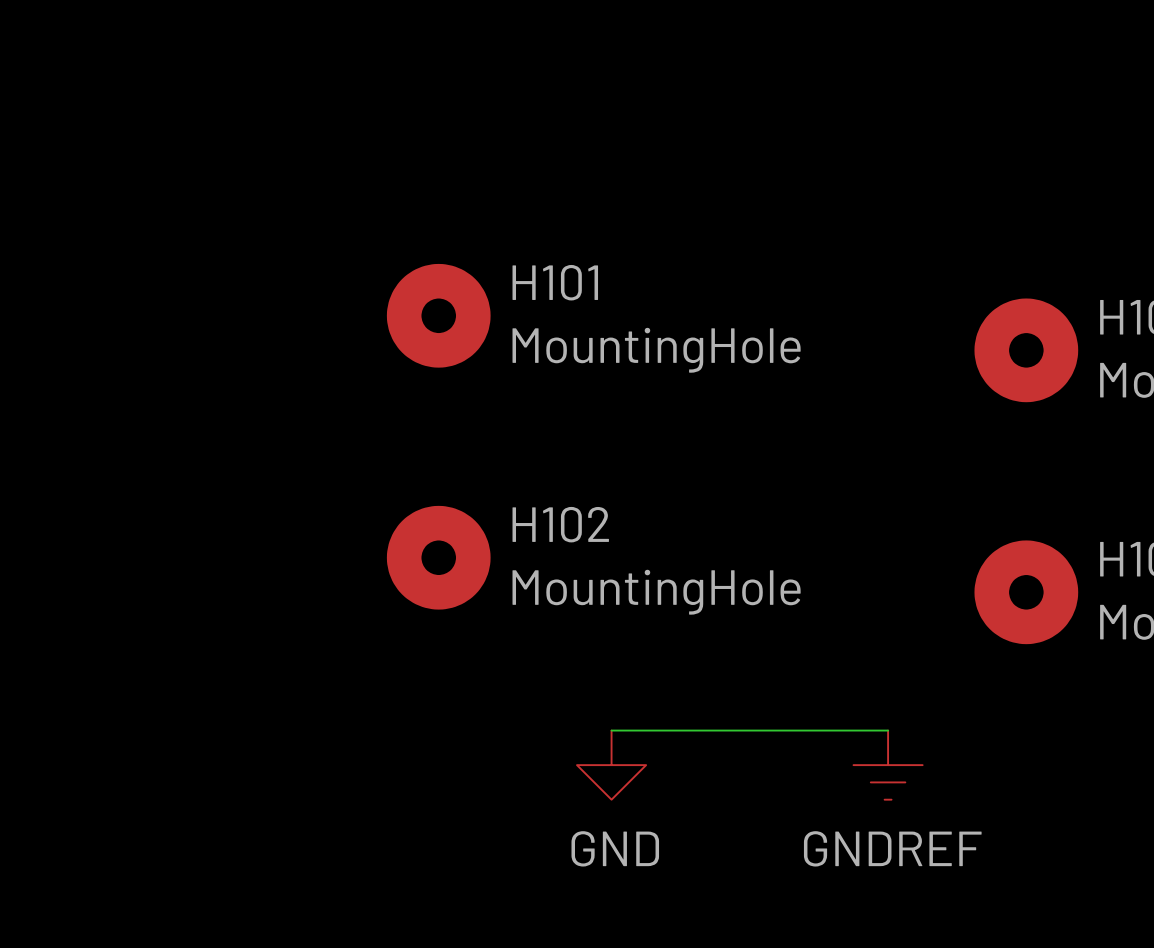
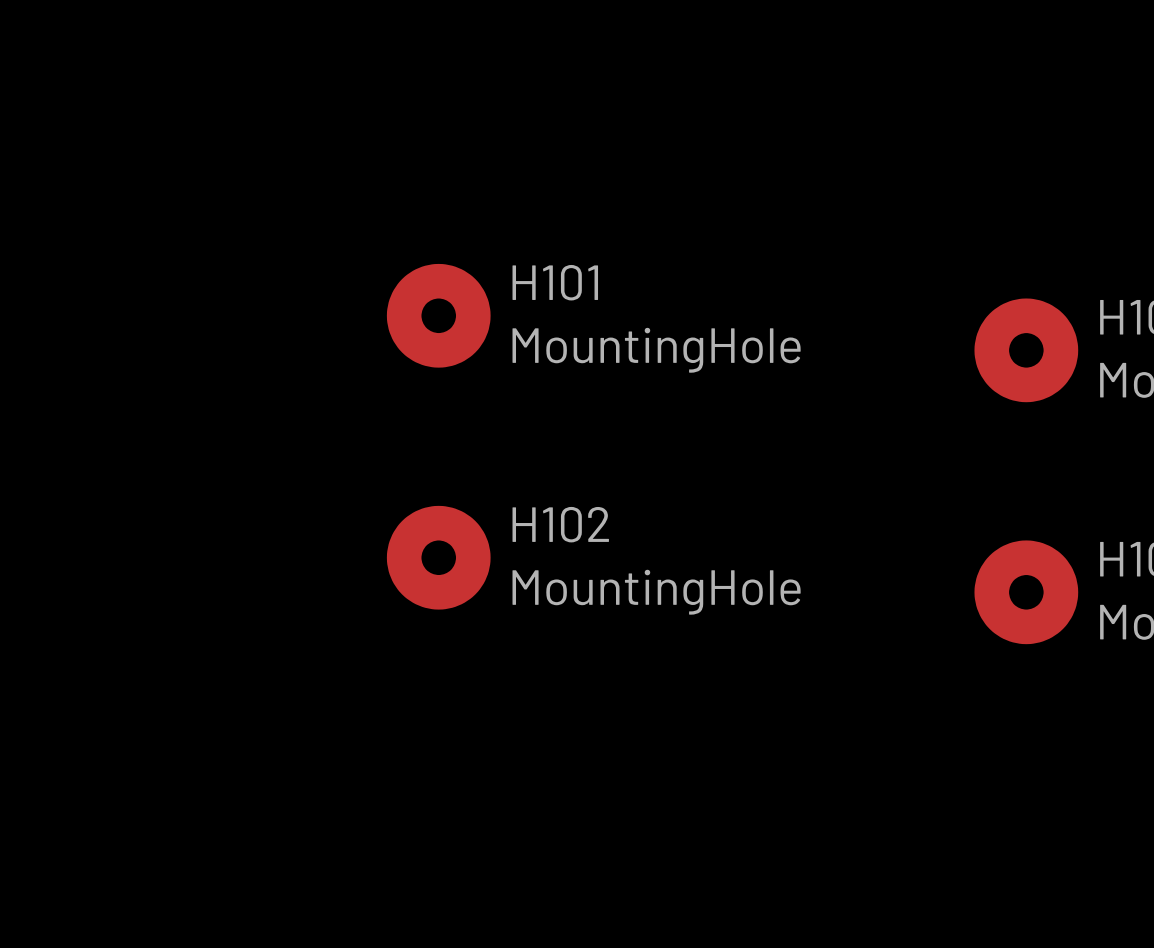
wire: (611, 730) (888, 730) -> none
power symbol: GND (611, 765) -> none
power symbol: GNDREF (888, 765) -> none

